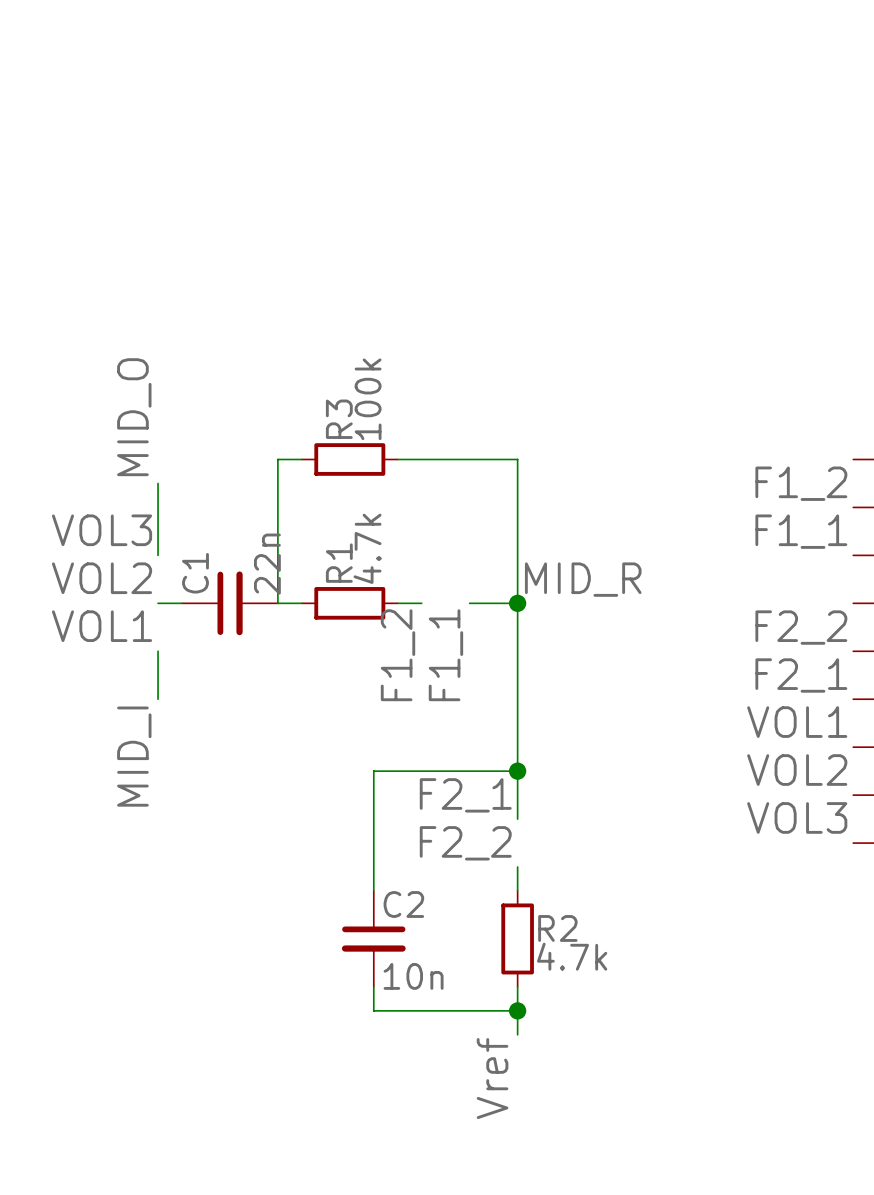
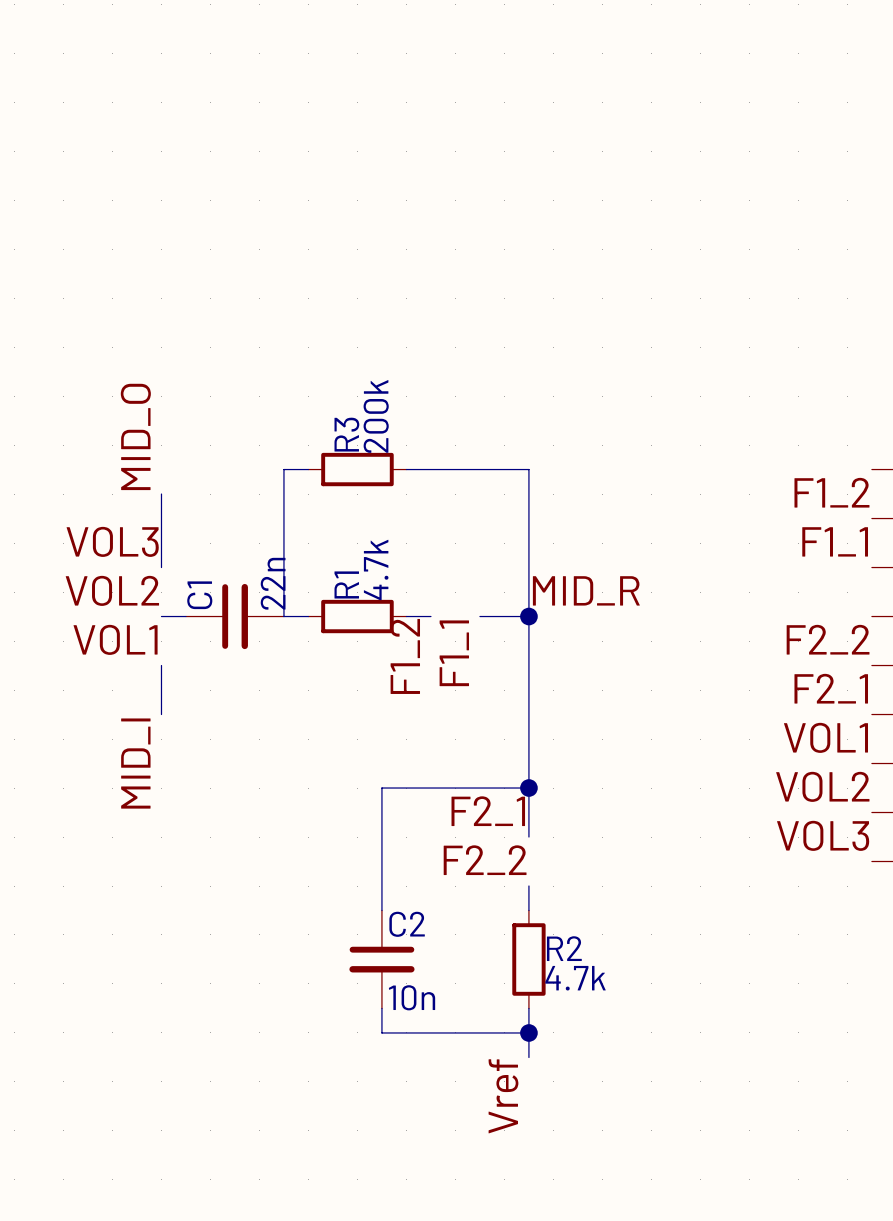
R3 value: 100k (368, 399) -> 200k (376, 416)

